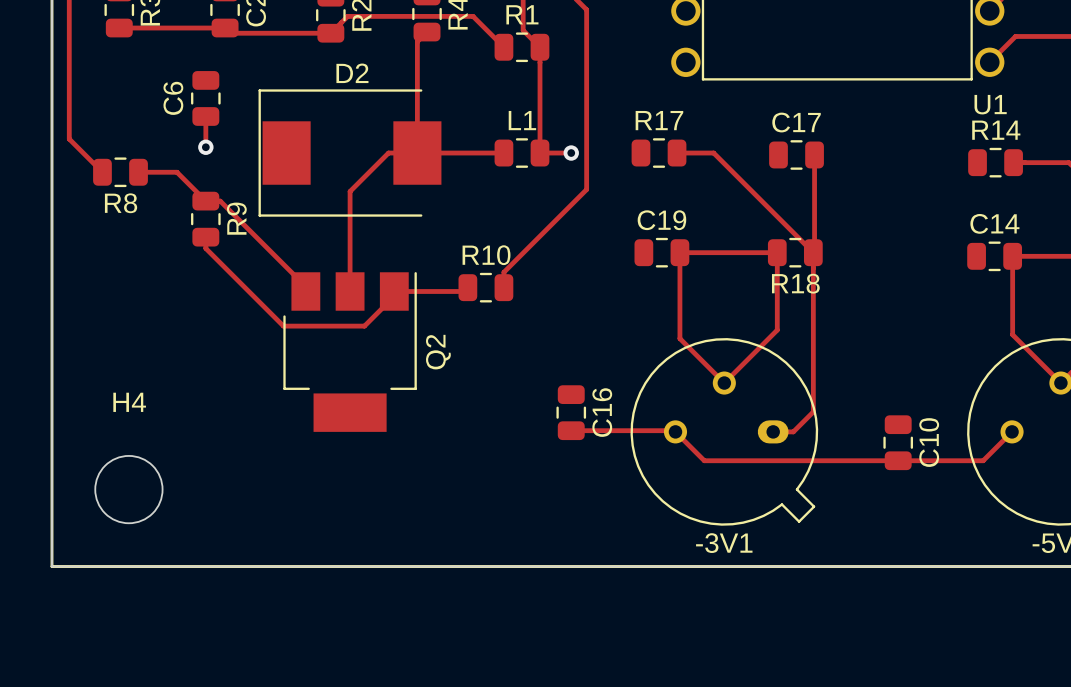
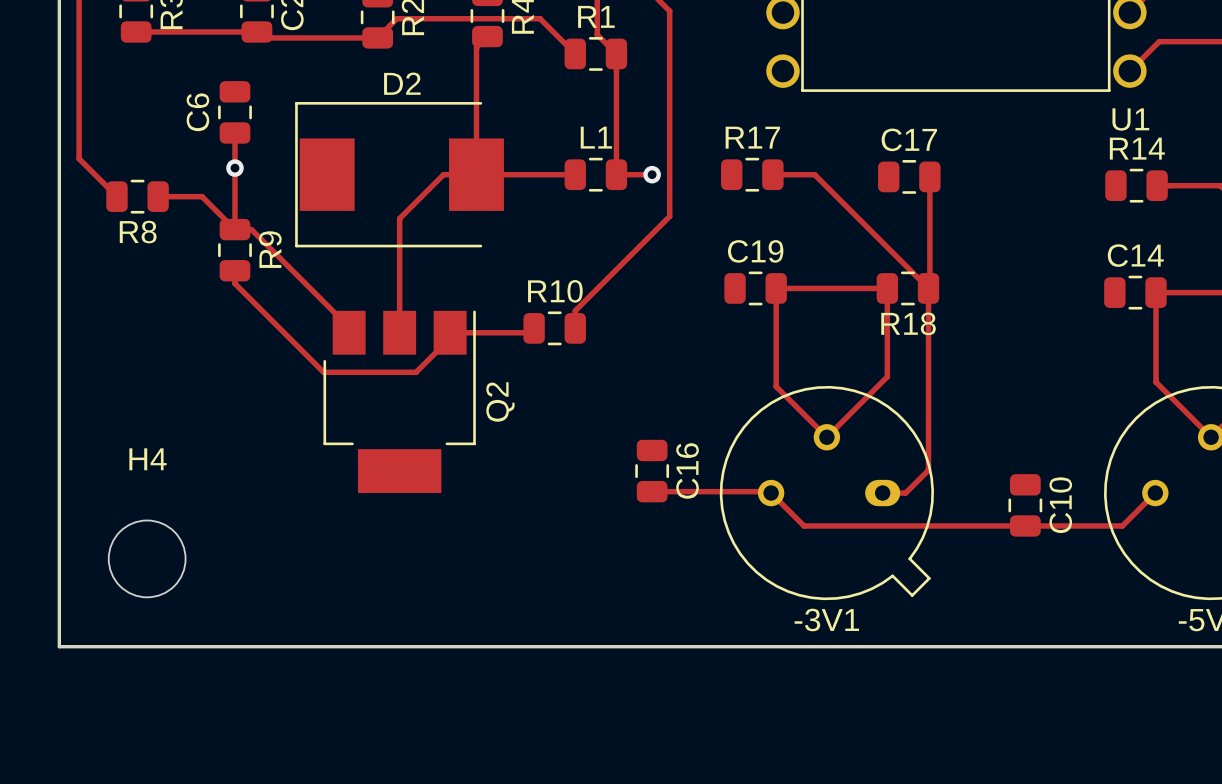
track: none -> (234, 168) (234, 229)

